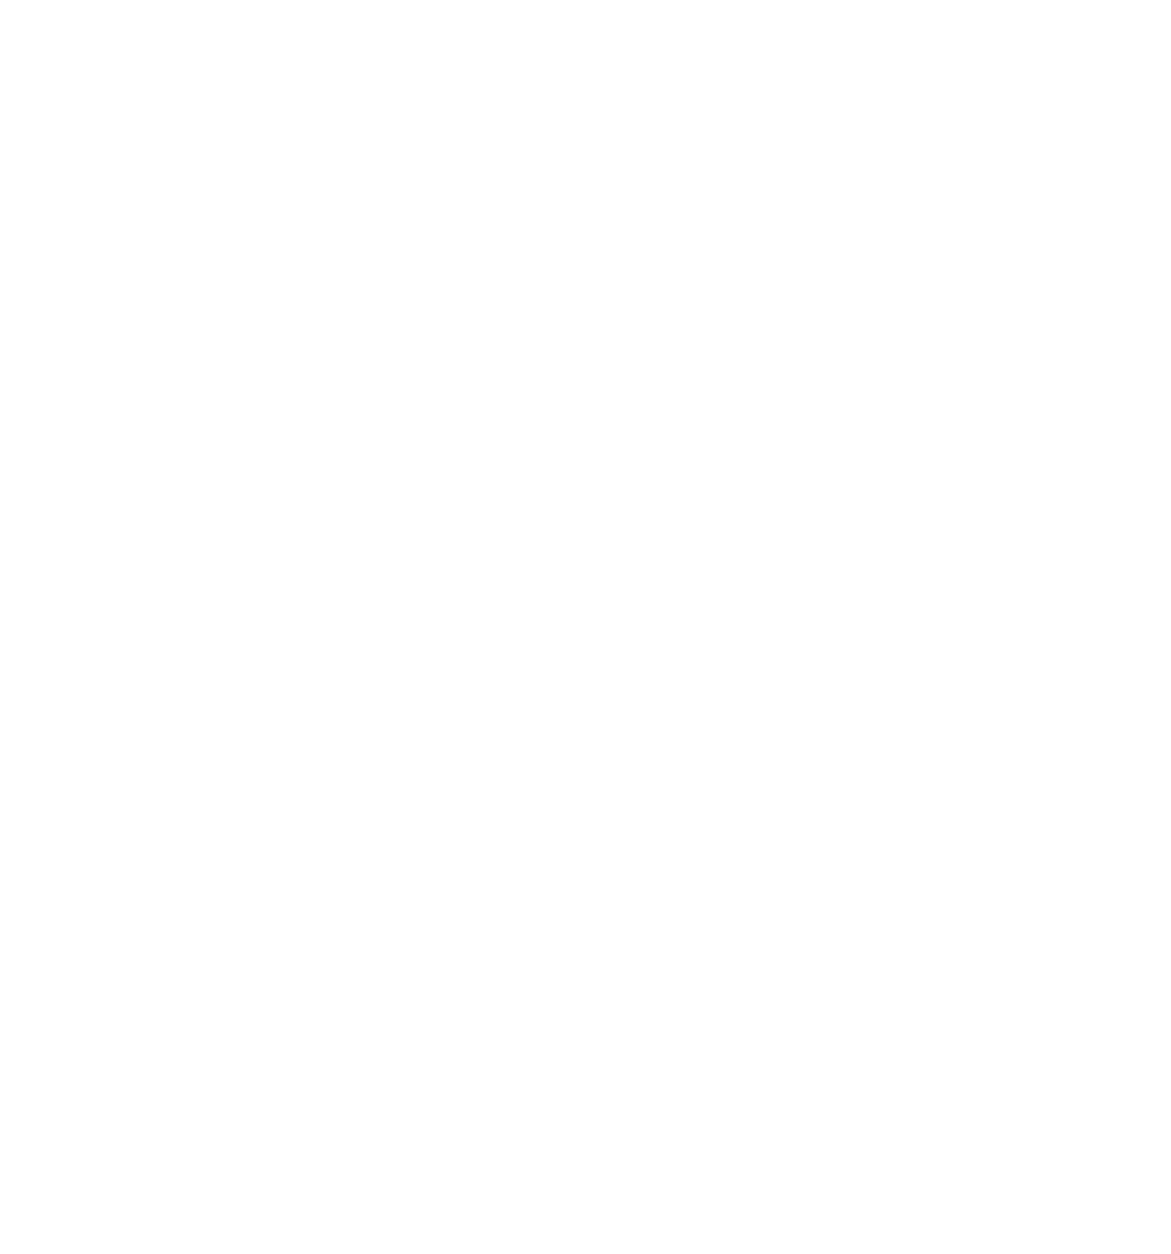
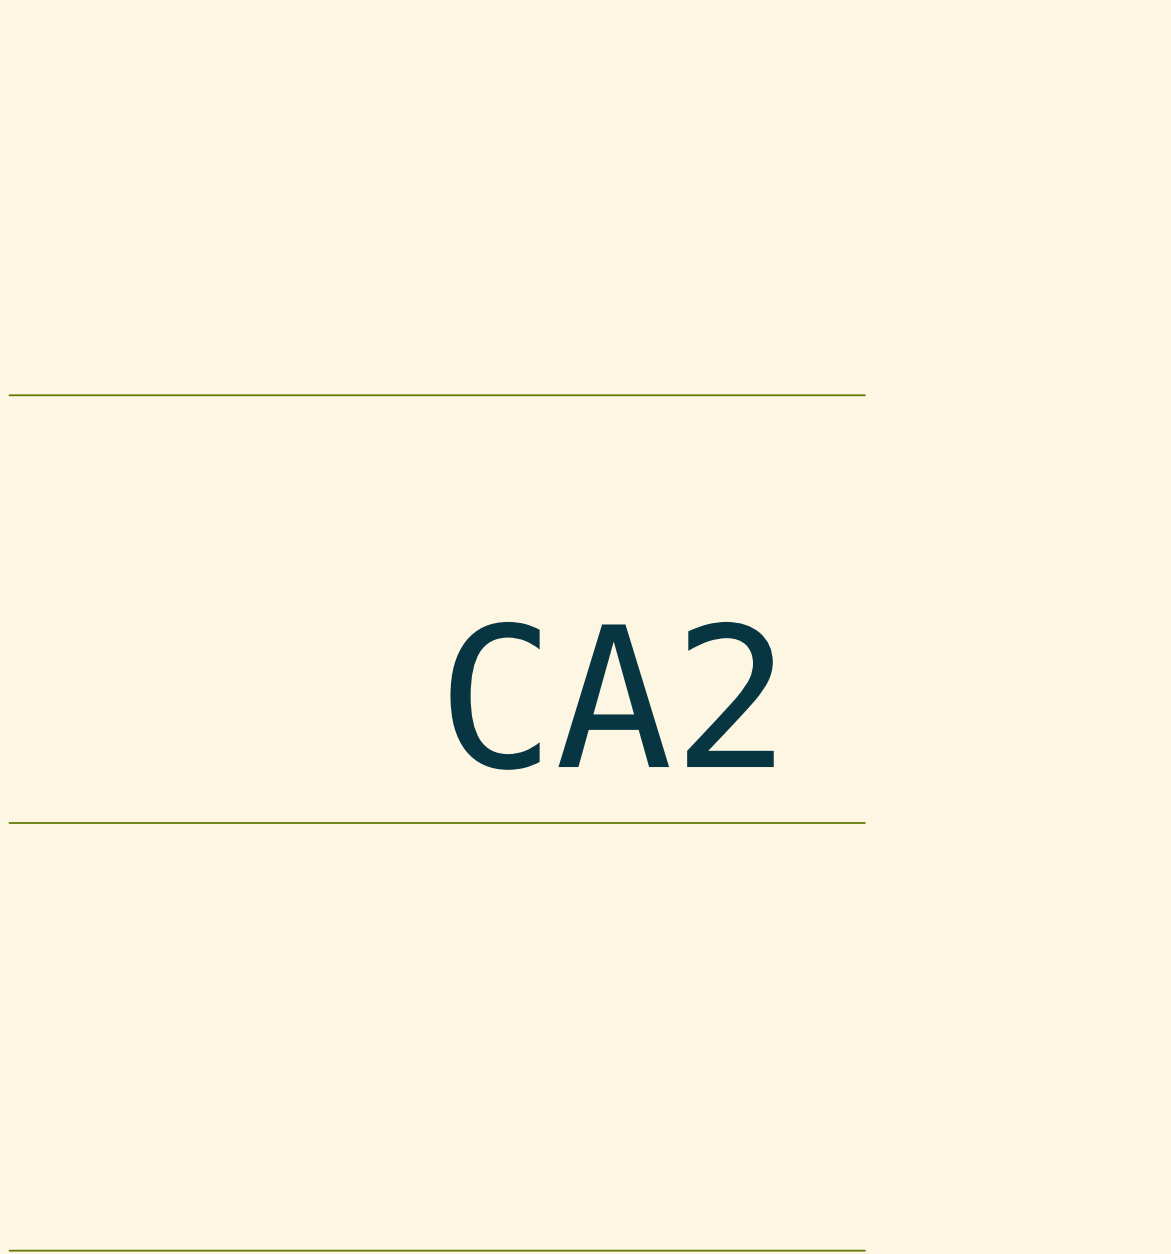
wire: none -> (9, 395) (864, 395)
label: none -> CA2 (612, 695)
wire: none -> (9, 822) (864, 822)
wire: none -> (9, 1250) (864, 1250)

